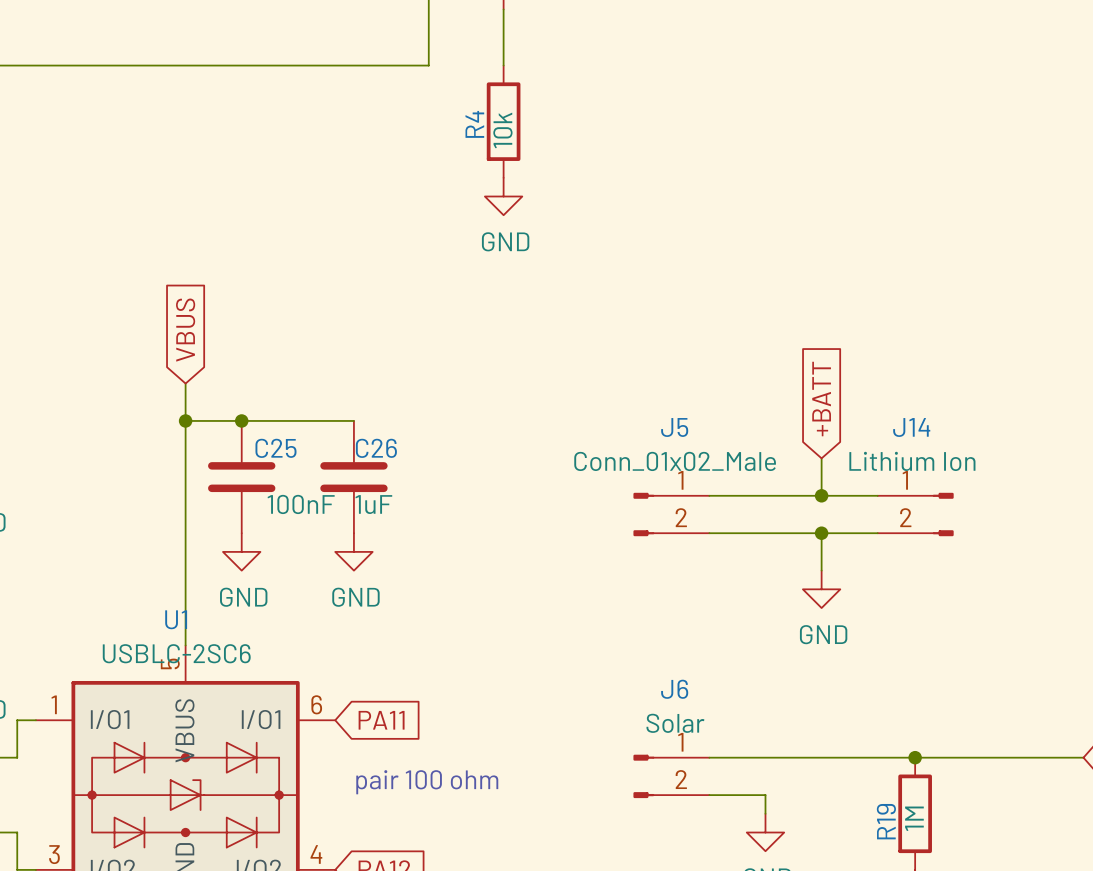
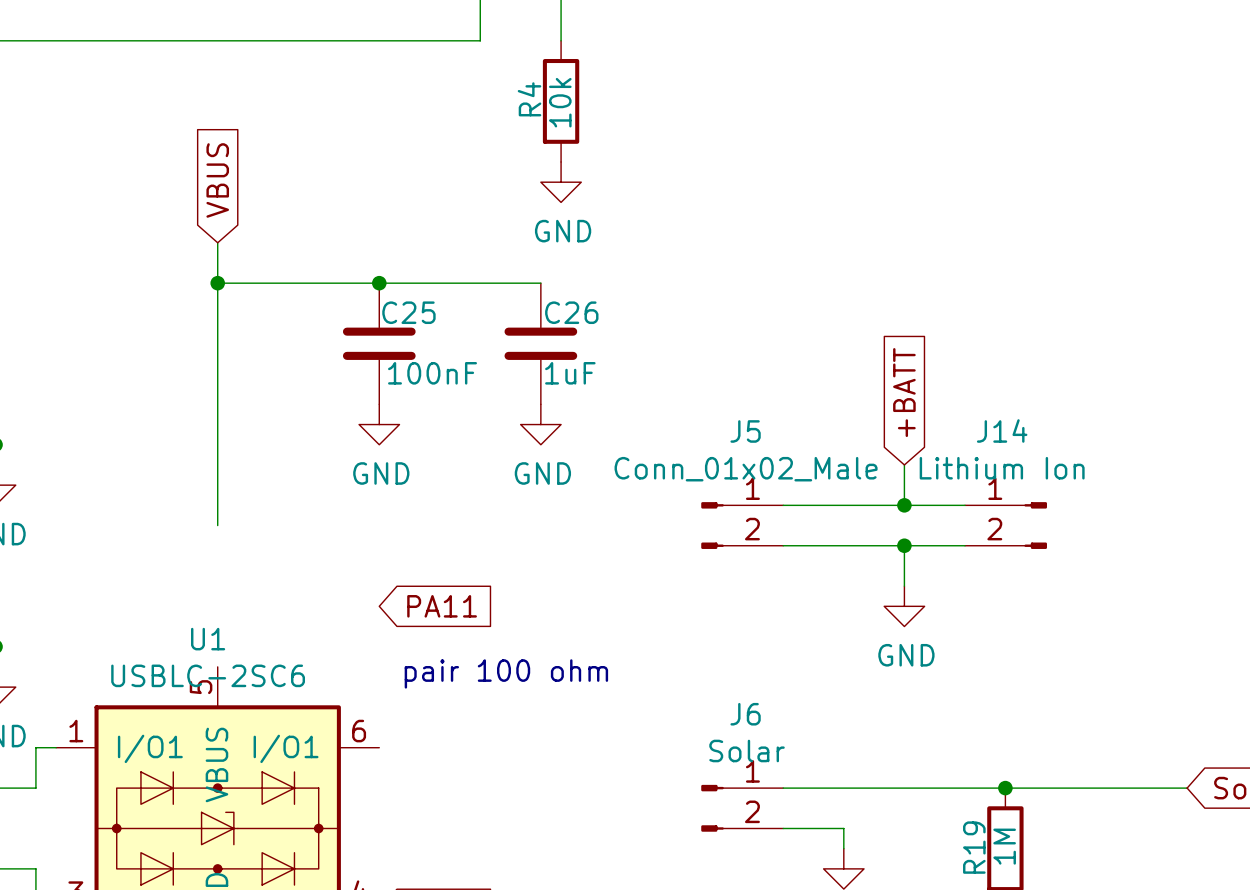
wire: none -> (217, 283) (540, 283)
junction: none -> (217, 283)
junction: none -> (379, 283)
global label position: VBUS (185, 330) -> VBUS (217, 180)
wire: (185, 420) (353, 420) -> none
junction: (185, 420) -> none
junction: (241, 420) -> none
power symbol: none -> GND (379, 424)
power symbol: none -> GND (540, 424)
C25 position: (241, 477) -> (379, 343)
C26 position: (353, 477) -> (540, 343)
wire: (185, 514) (185, 645) -> (217, 242) (217, 384)
power symbol: GND (241, 551) -> none
power symbol: GND (353, 551) -> none
global label position: PA11 (381, 720) -> PA11 (442, 606)
text position: pair 100 ohm (427, 782) -> pair 100 ohm (506, 673)

